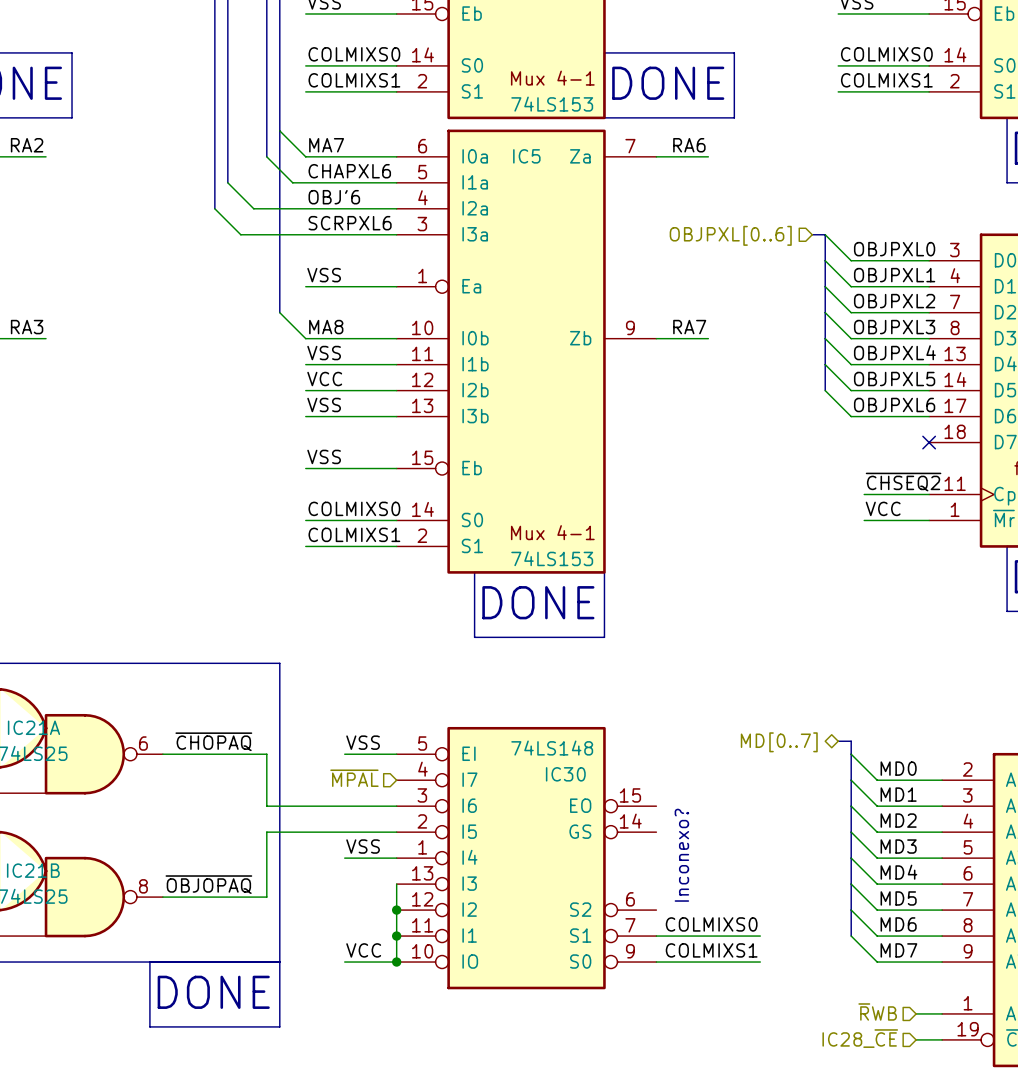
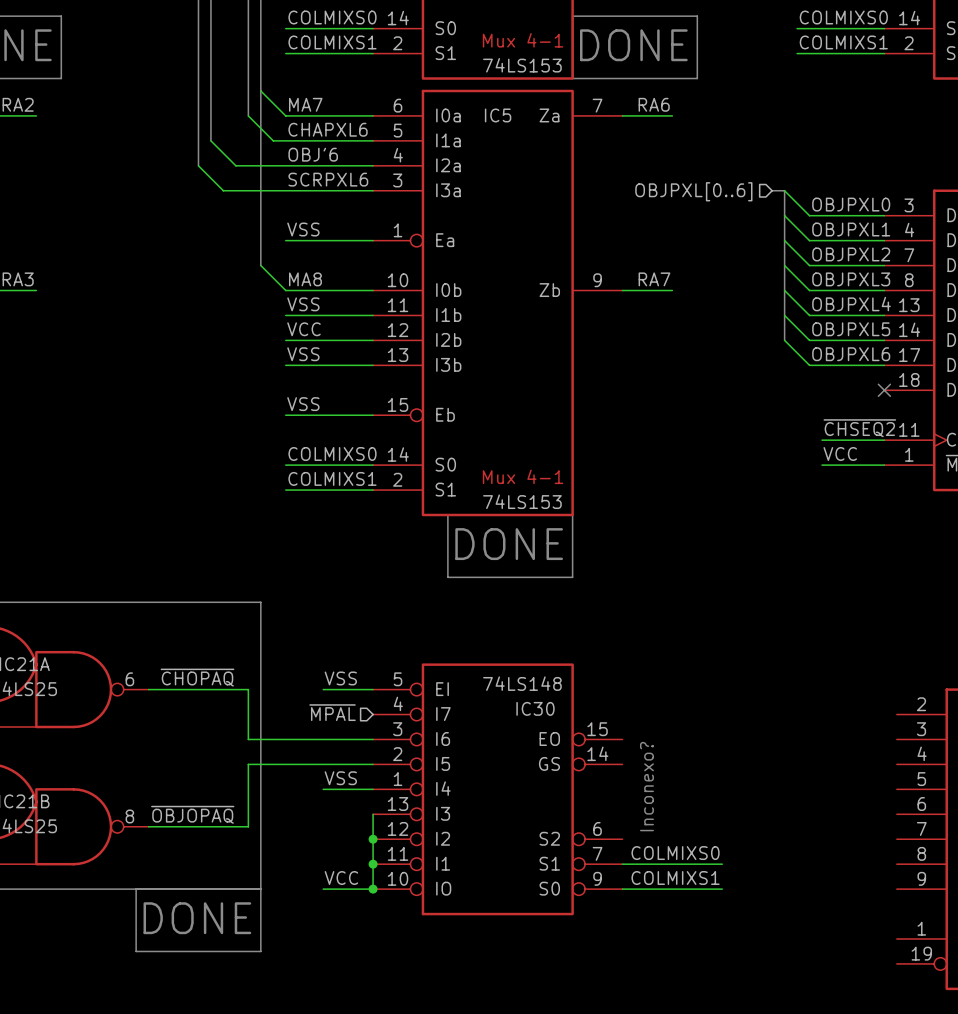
bus: (838, 741) (851, 741) (851, 936) -> none
hierarchical label: MD[0..7] (779, 742) -> none
wire: (851, 754) (877, 780) (942, 780) -> none
label: MD0 (898, 768) -> none
wire: (851, 780) (877, 806) (942, 806) -> none
label: MD1 (898, 794) -> none
wire: (851, 806) (877, 832) (942, 832) -> none
label: MD2 (898, 820) -> none
wire: (851, 832) (877, 858) (942, 858) -> none
label: MD3 (898, 846) -> none
wire: (851, 858) (877, 884) (942, 884) -> none
label: MD4 (898, 872) -> none
wire: (851, 884) (877, 910) (942, 910) -> none
label: MD5 (898, 898) -> none
wire: (851, 910) (877, 936) (942, 936) -> none
label: MD6 (898, 924) -> none
wire: (851, 936) (877, 962) (942, 962) -> none
label: MD7 (898, 950) -> none
hierarchical label: ~{R}WB (877, 1011) -> none
wire: (916, 1013) (942, 1013) -> none
hierarchical label: IC28_~{CE} (860, 1038) -> none
wire: (916, 1039) (942, 1039) -> none

